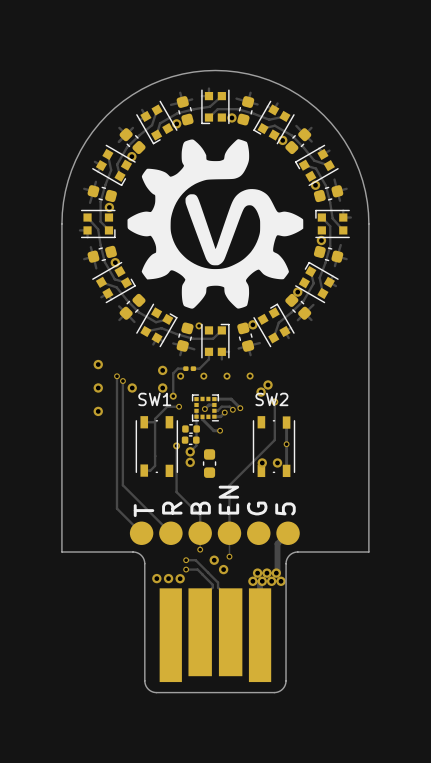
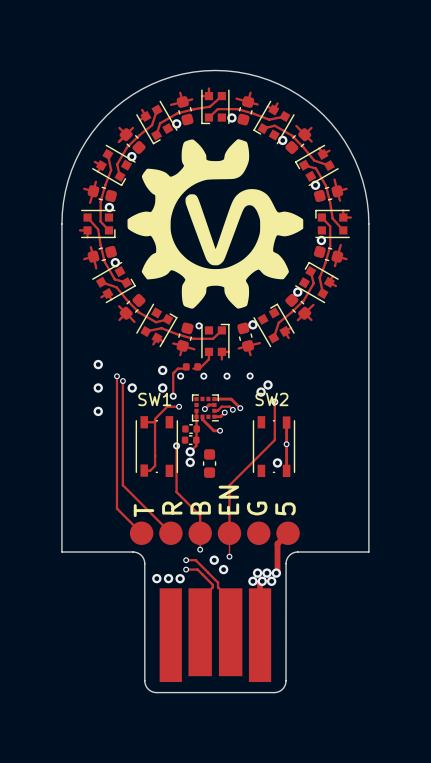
part footprint: [183, 366, 197, 372] -> [182, 363, 202, 371]
via: (262, 462) -> none
via: (281, 581) -> none

